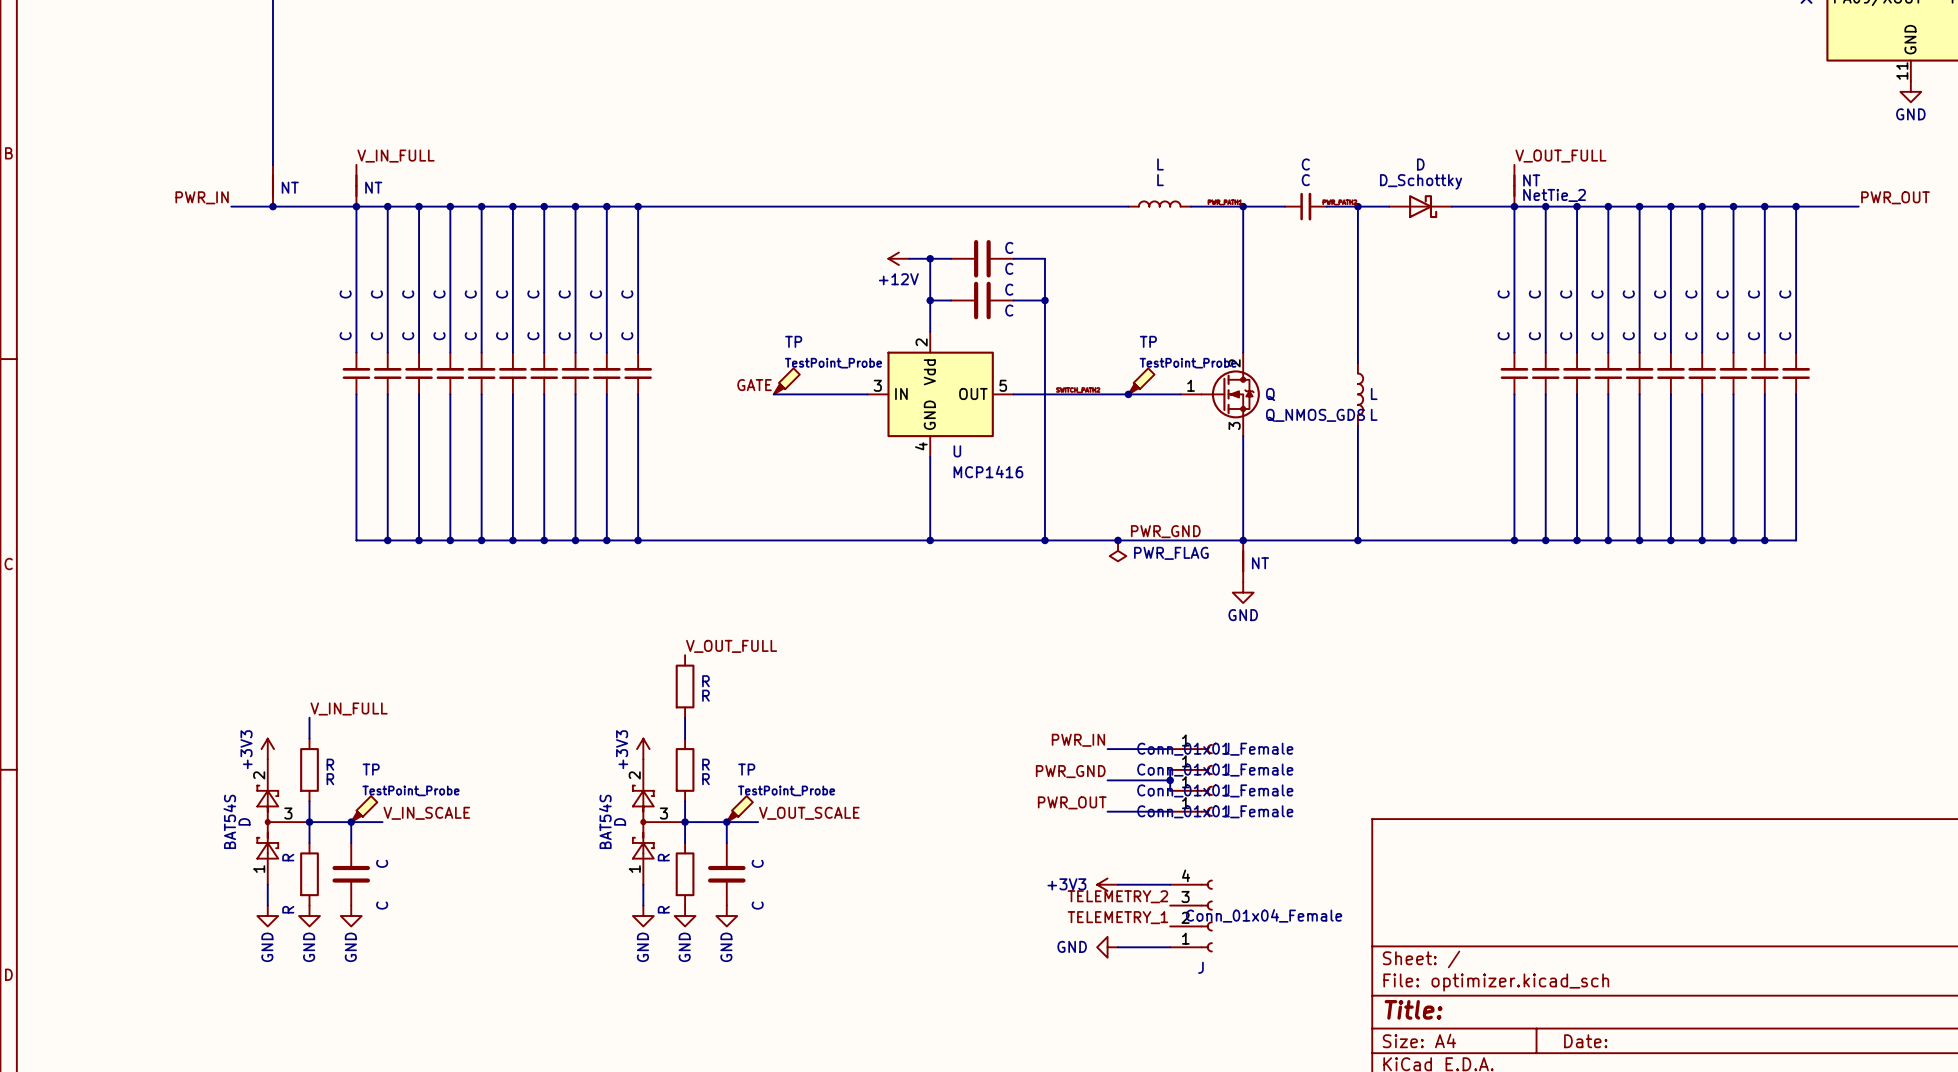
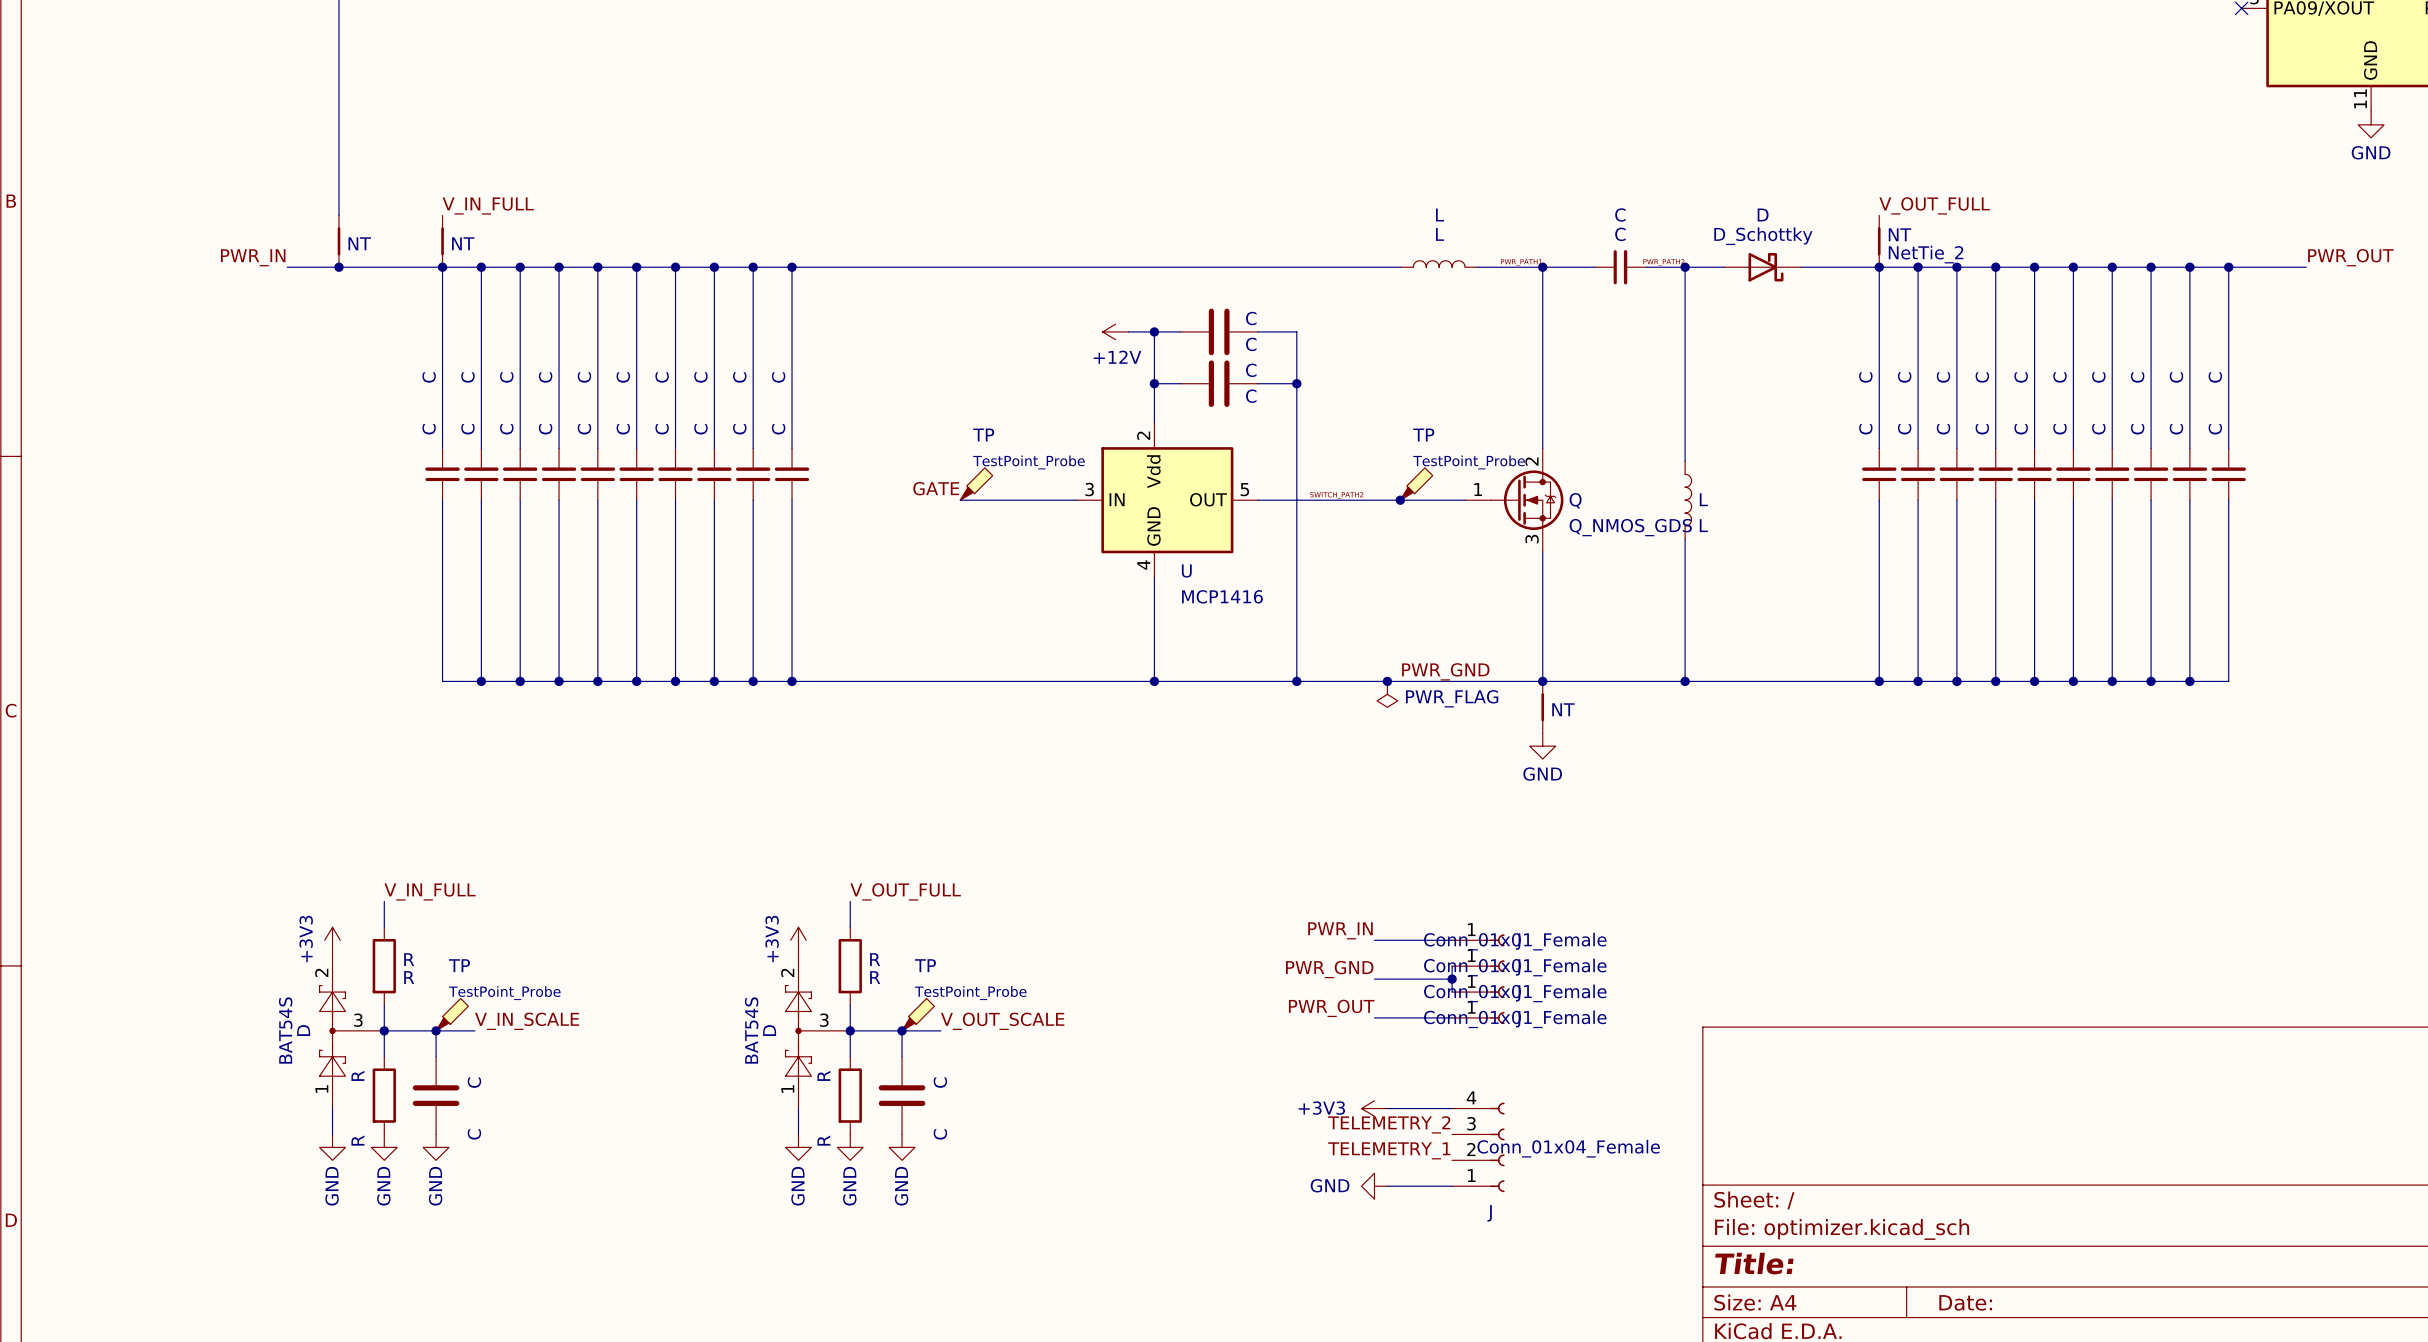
label position: V_OUT_FULL (731, 646) -> V_OUT_FULL (905, 891)
R: R (685, 686) -> none

